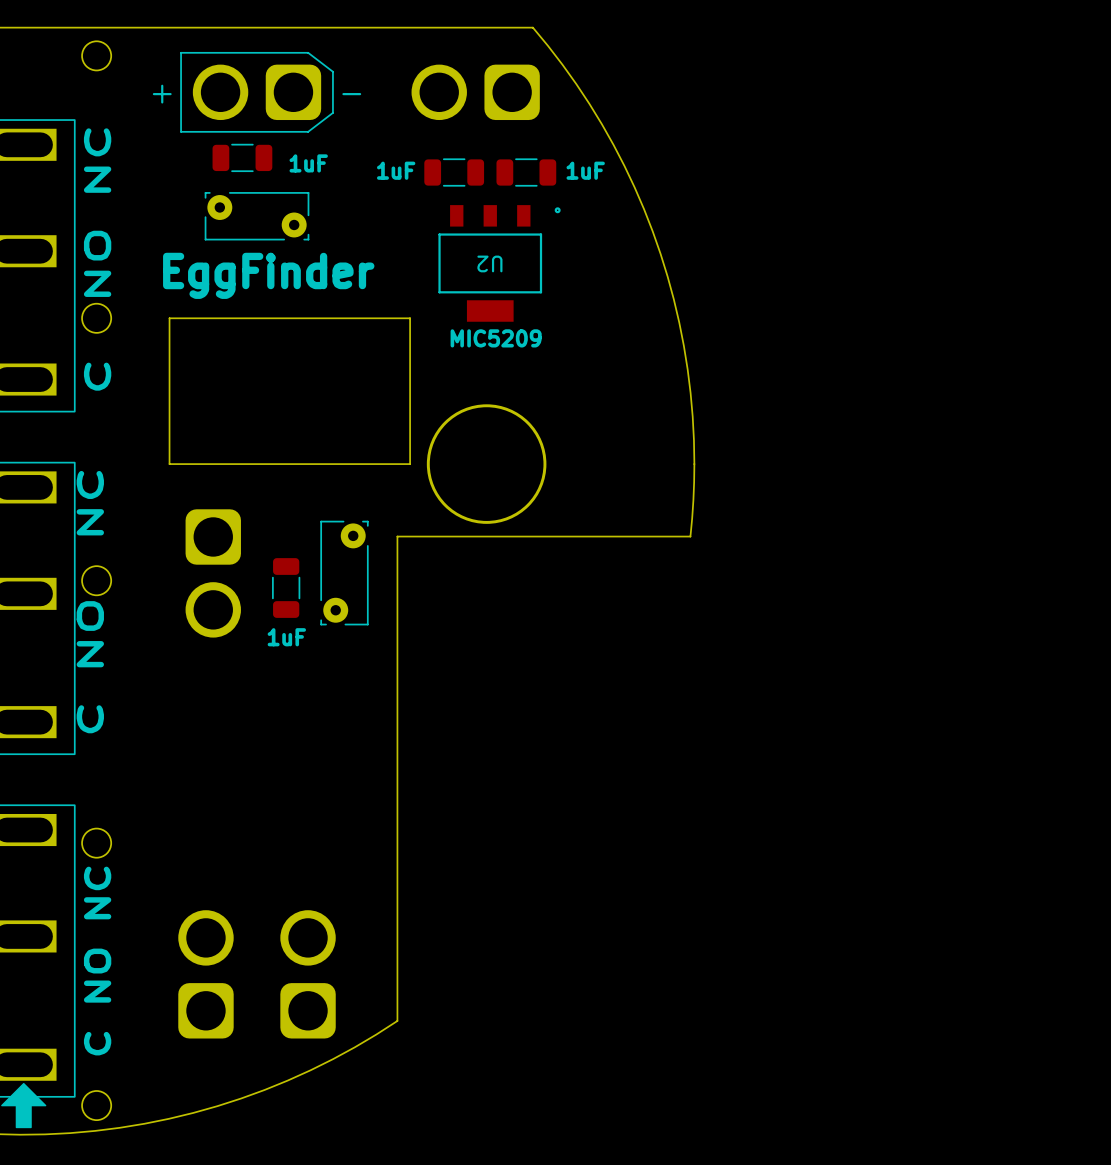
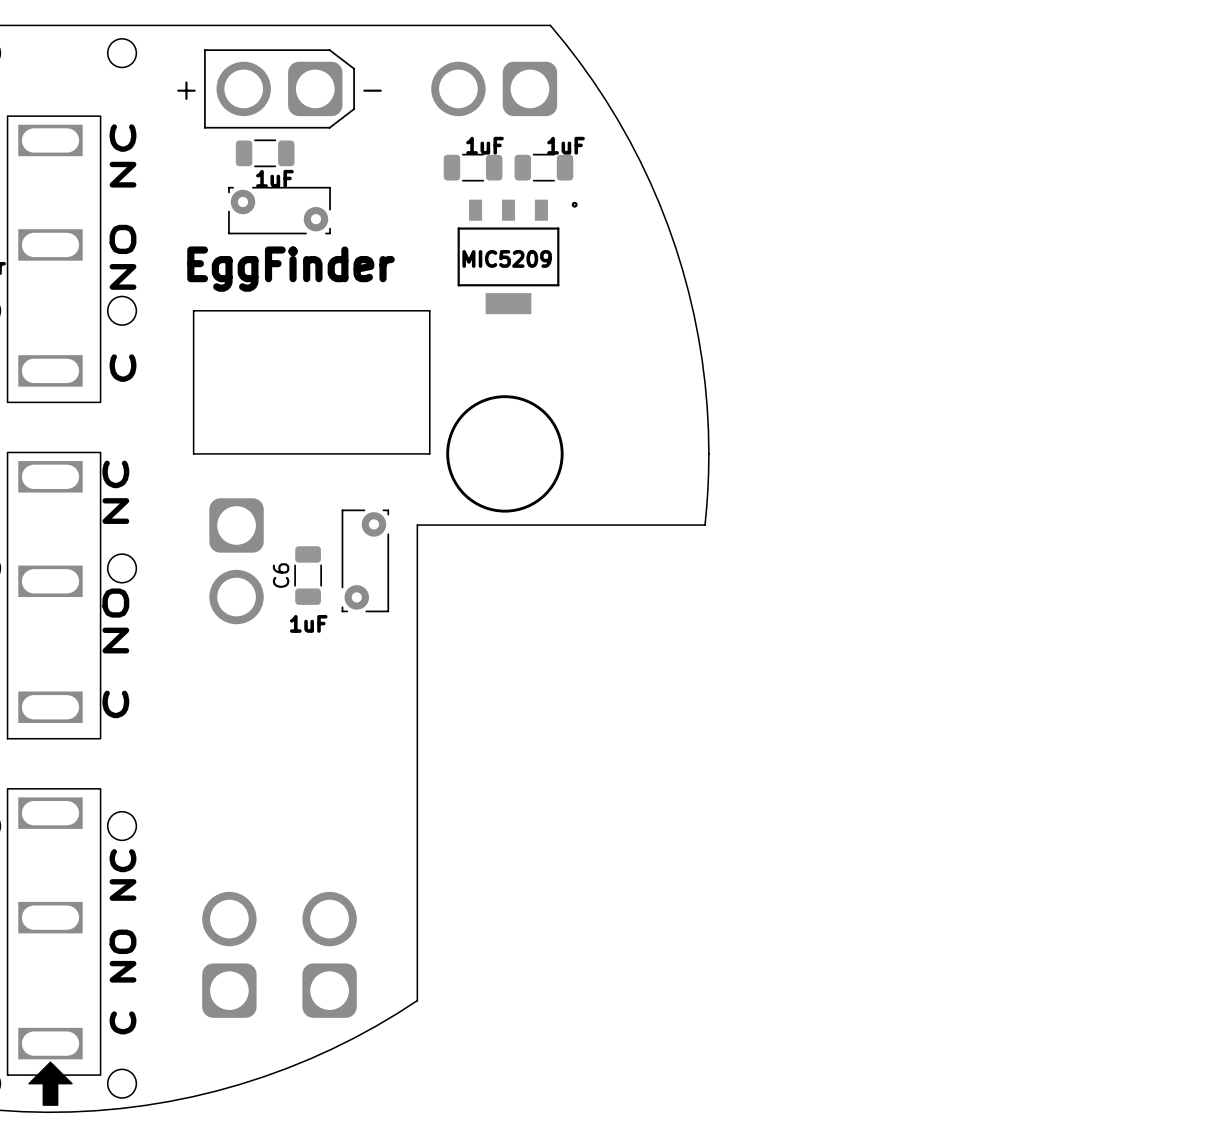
text: none -> 1uF (485, 145)
text position: 1uF (308, 163) -> 1uF (274, 178)
text: 1uF (396, 170) -> none
text position: 1uF (585, 170) -> 1uF (566, 145)
U2 name: U2 (489, 263) -> none
text position: MIC5209 (496, 338) -> MIC5209 (507, 258)
C6 name: none -> C6 (281, 575)

